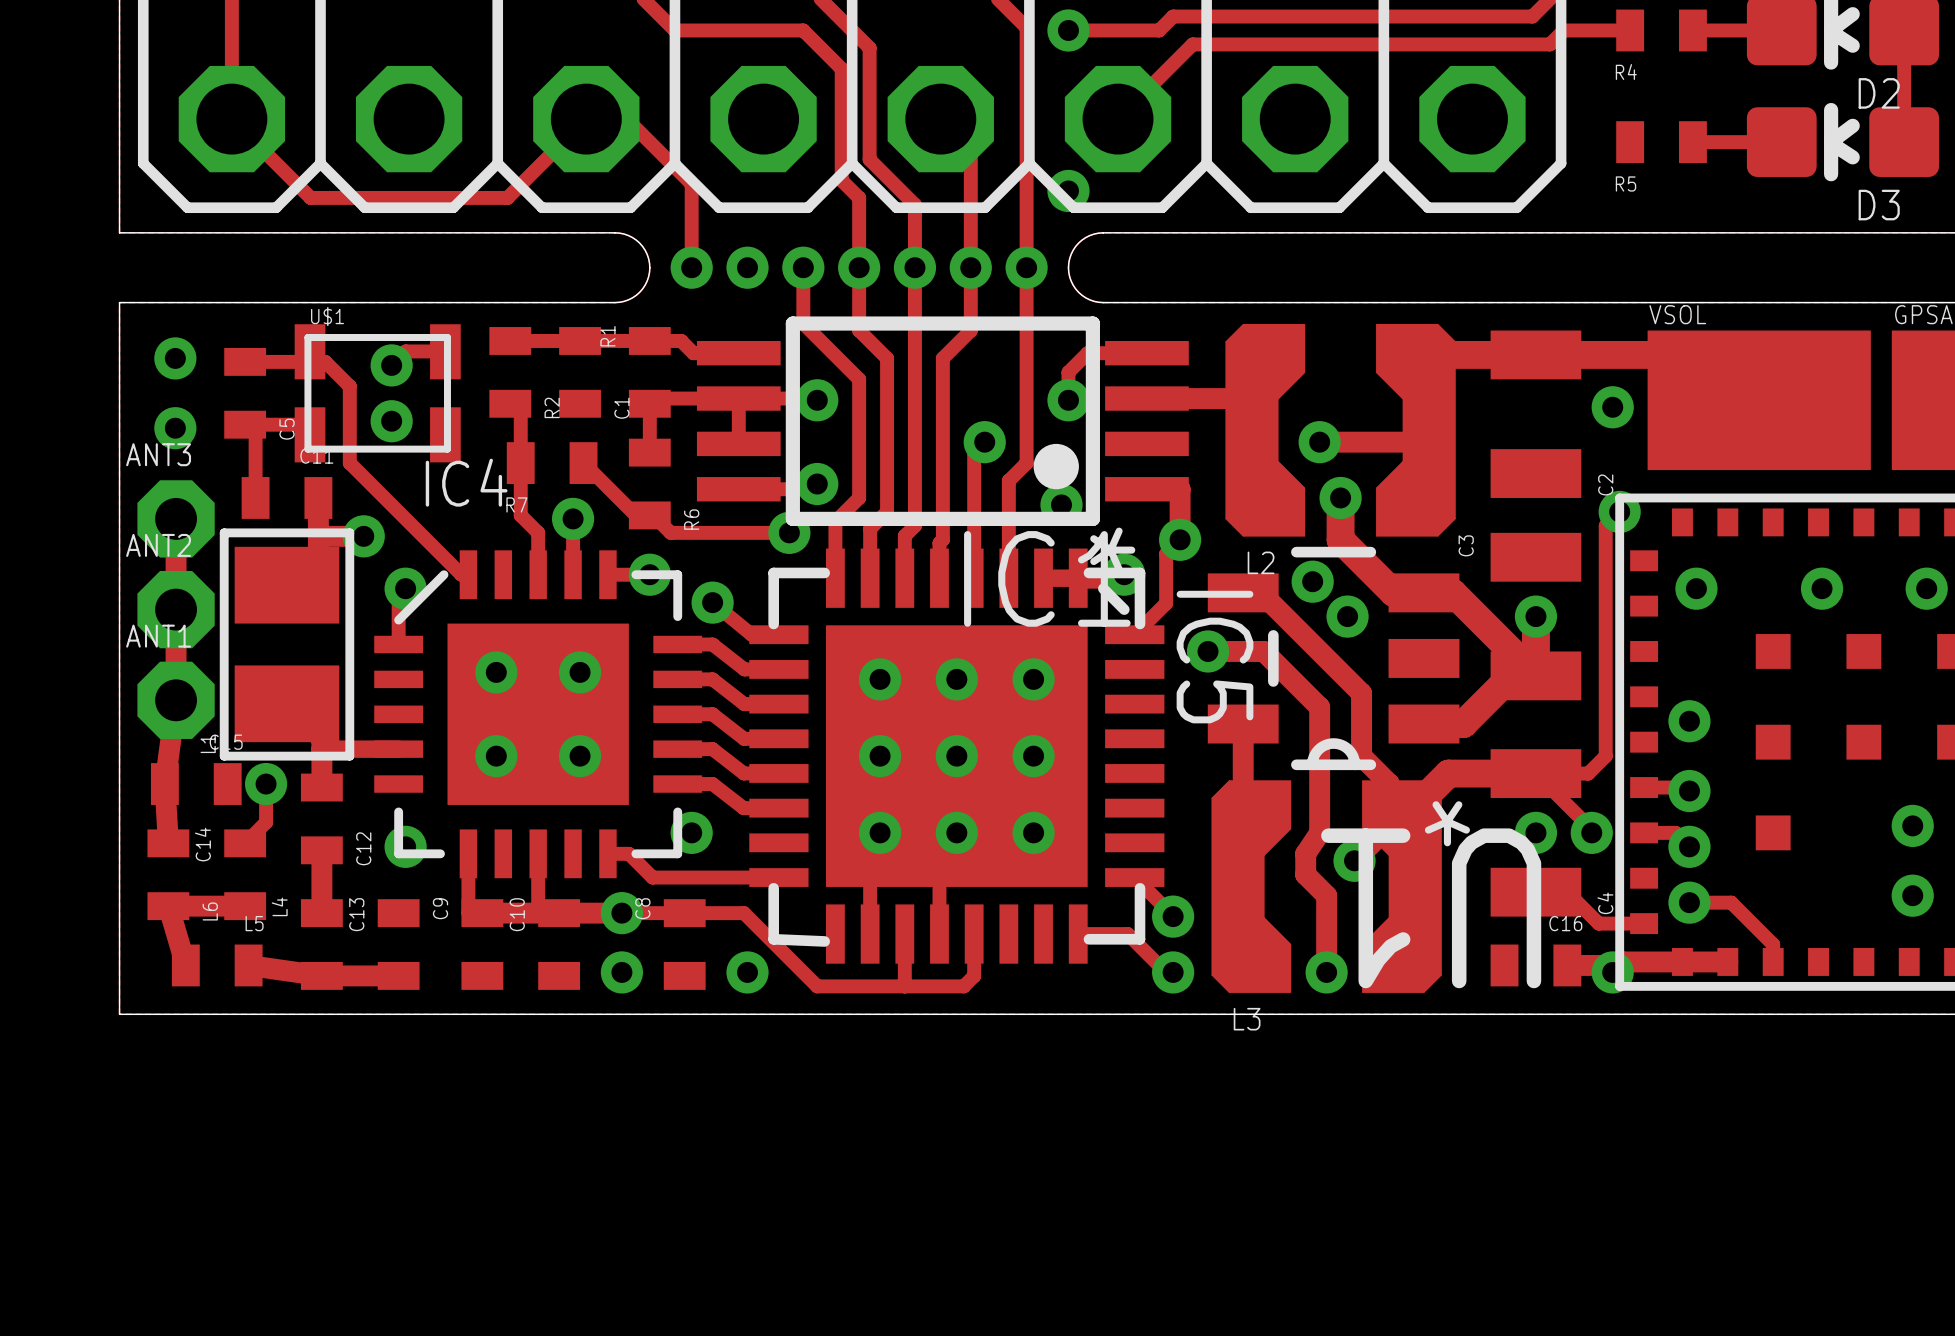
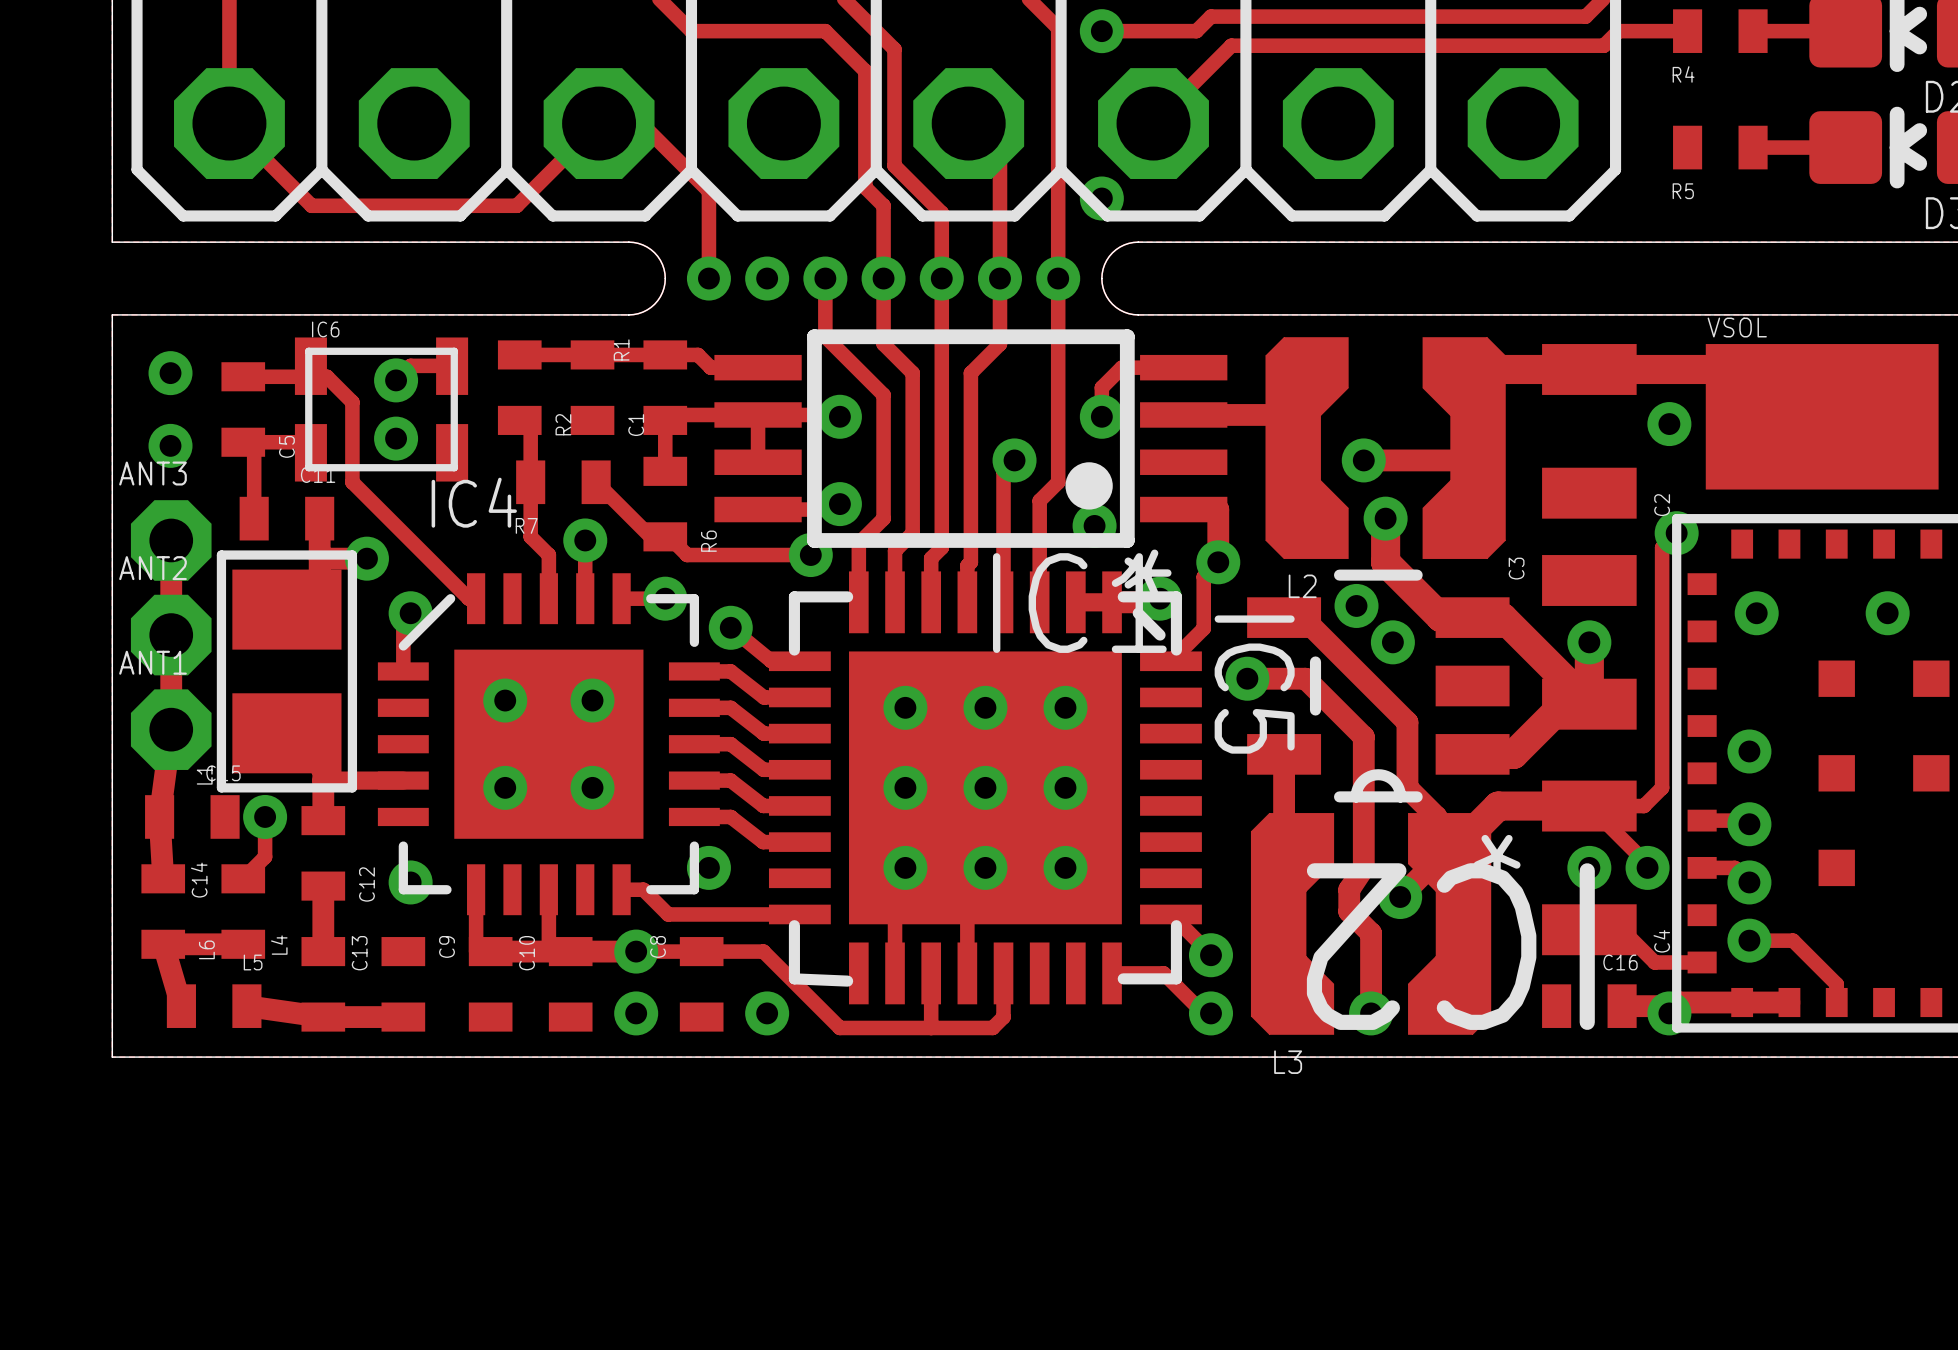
U$1 name: U$1 (327, 316) -> IC6 (325, 329)
U1 name: U1 (1431, 908) -> IC2 (1450, 946)

